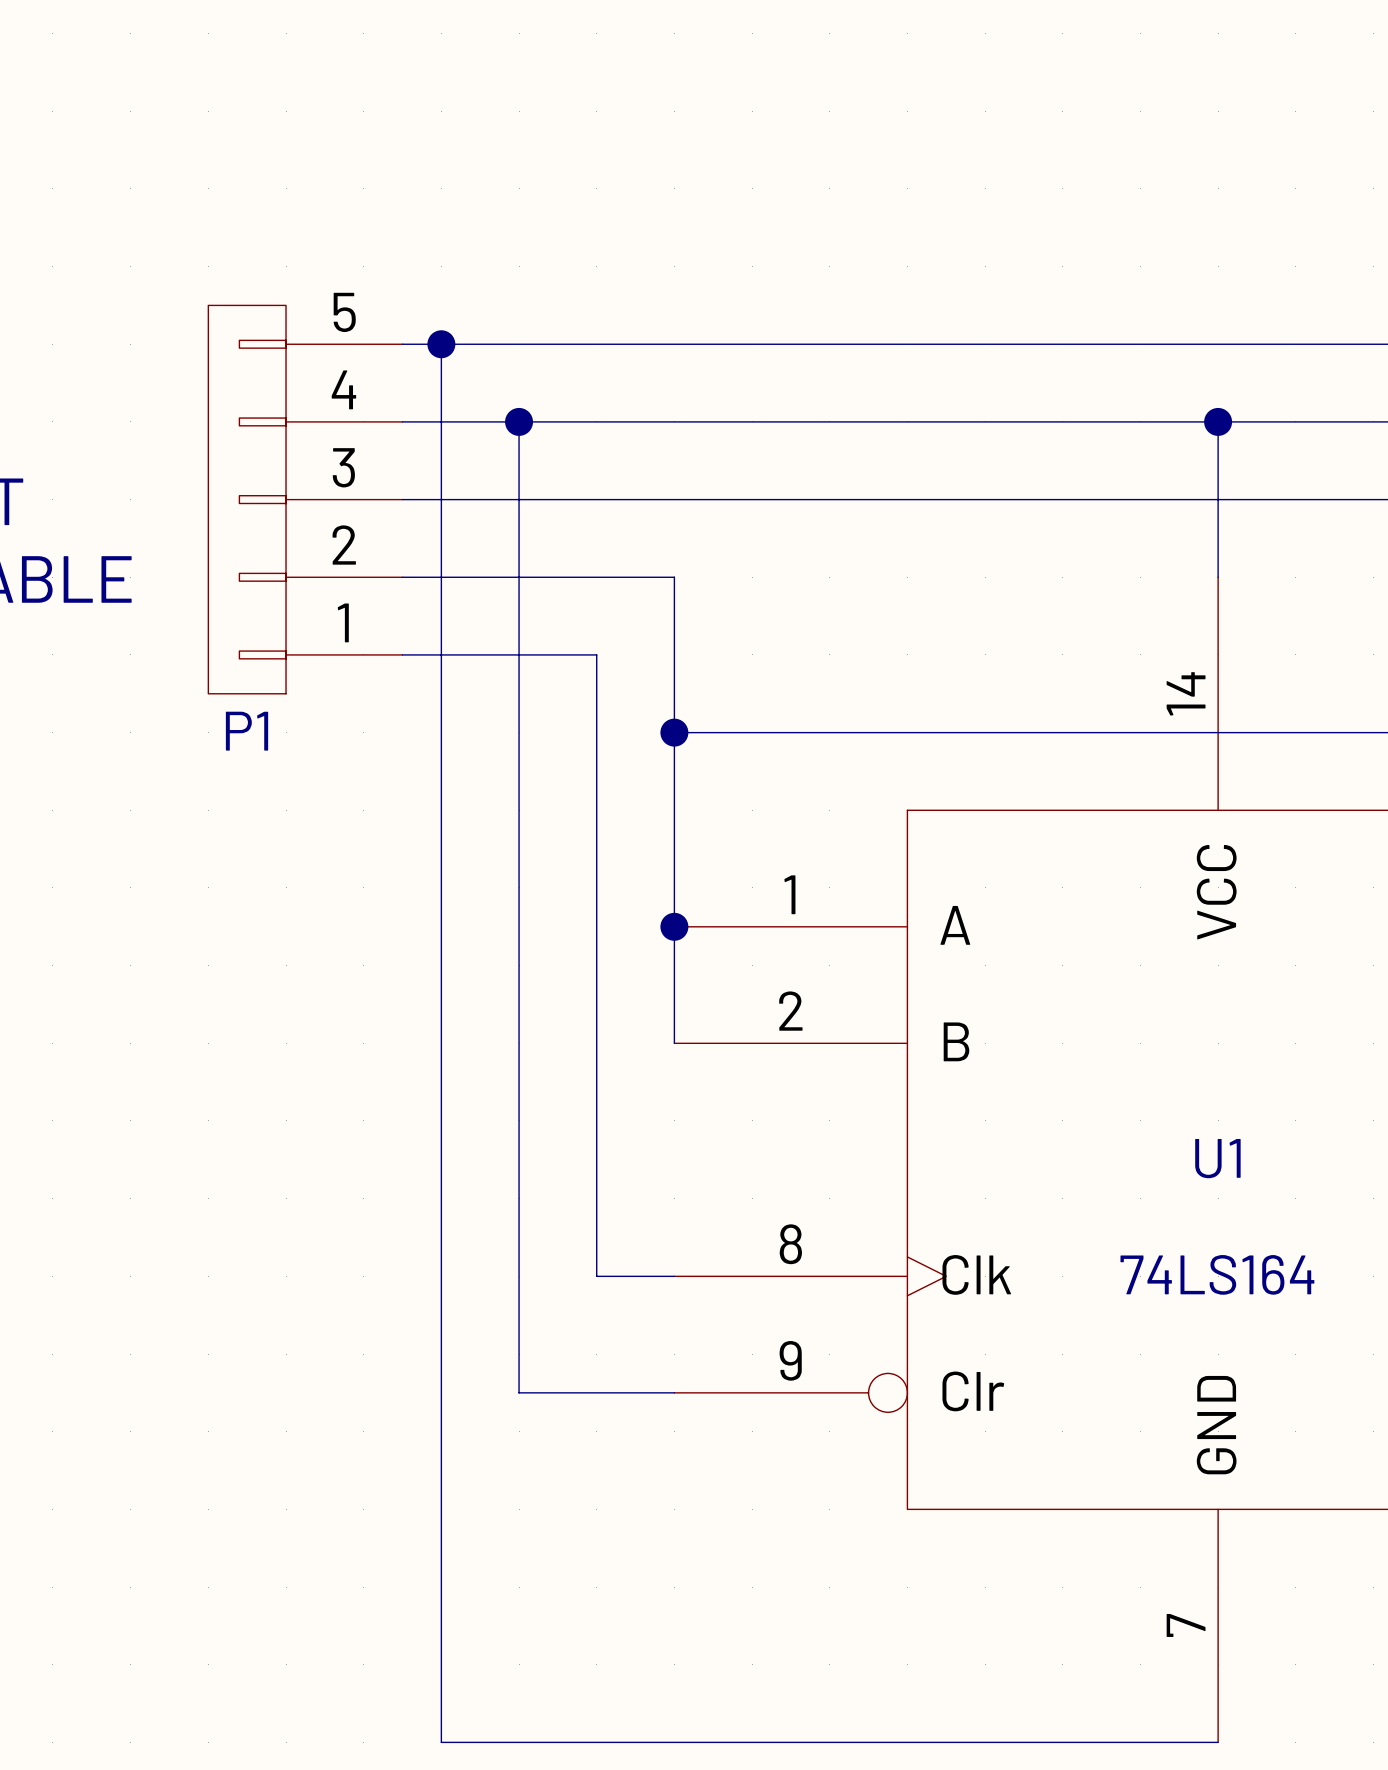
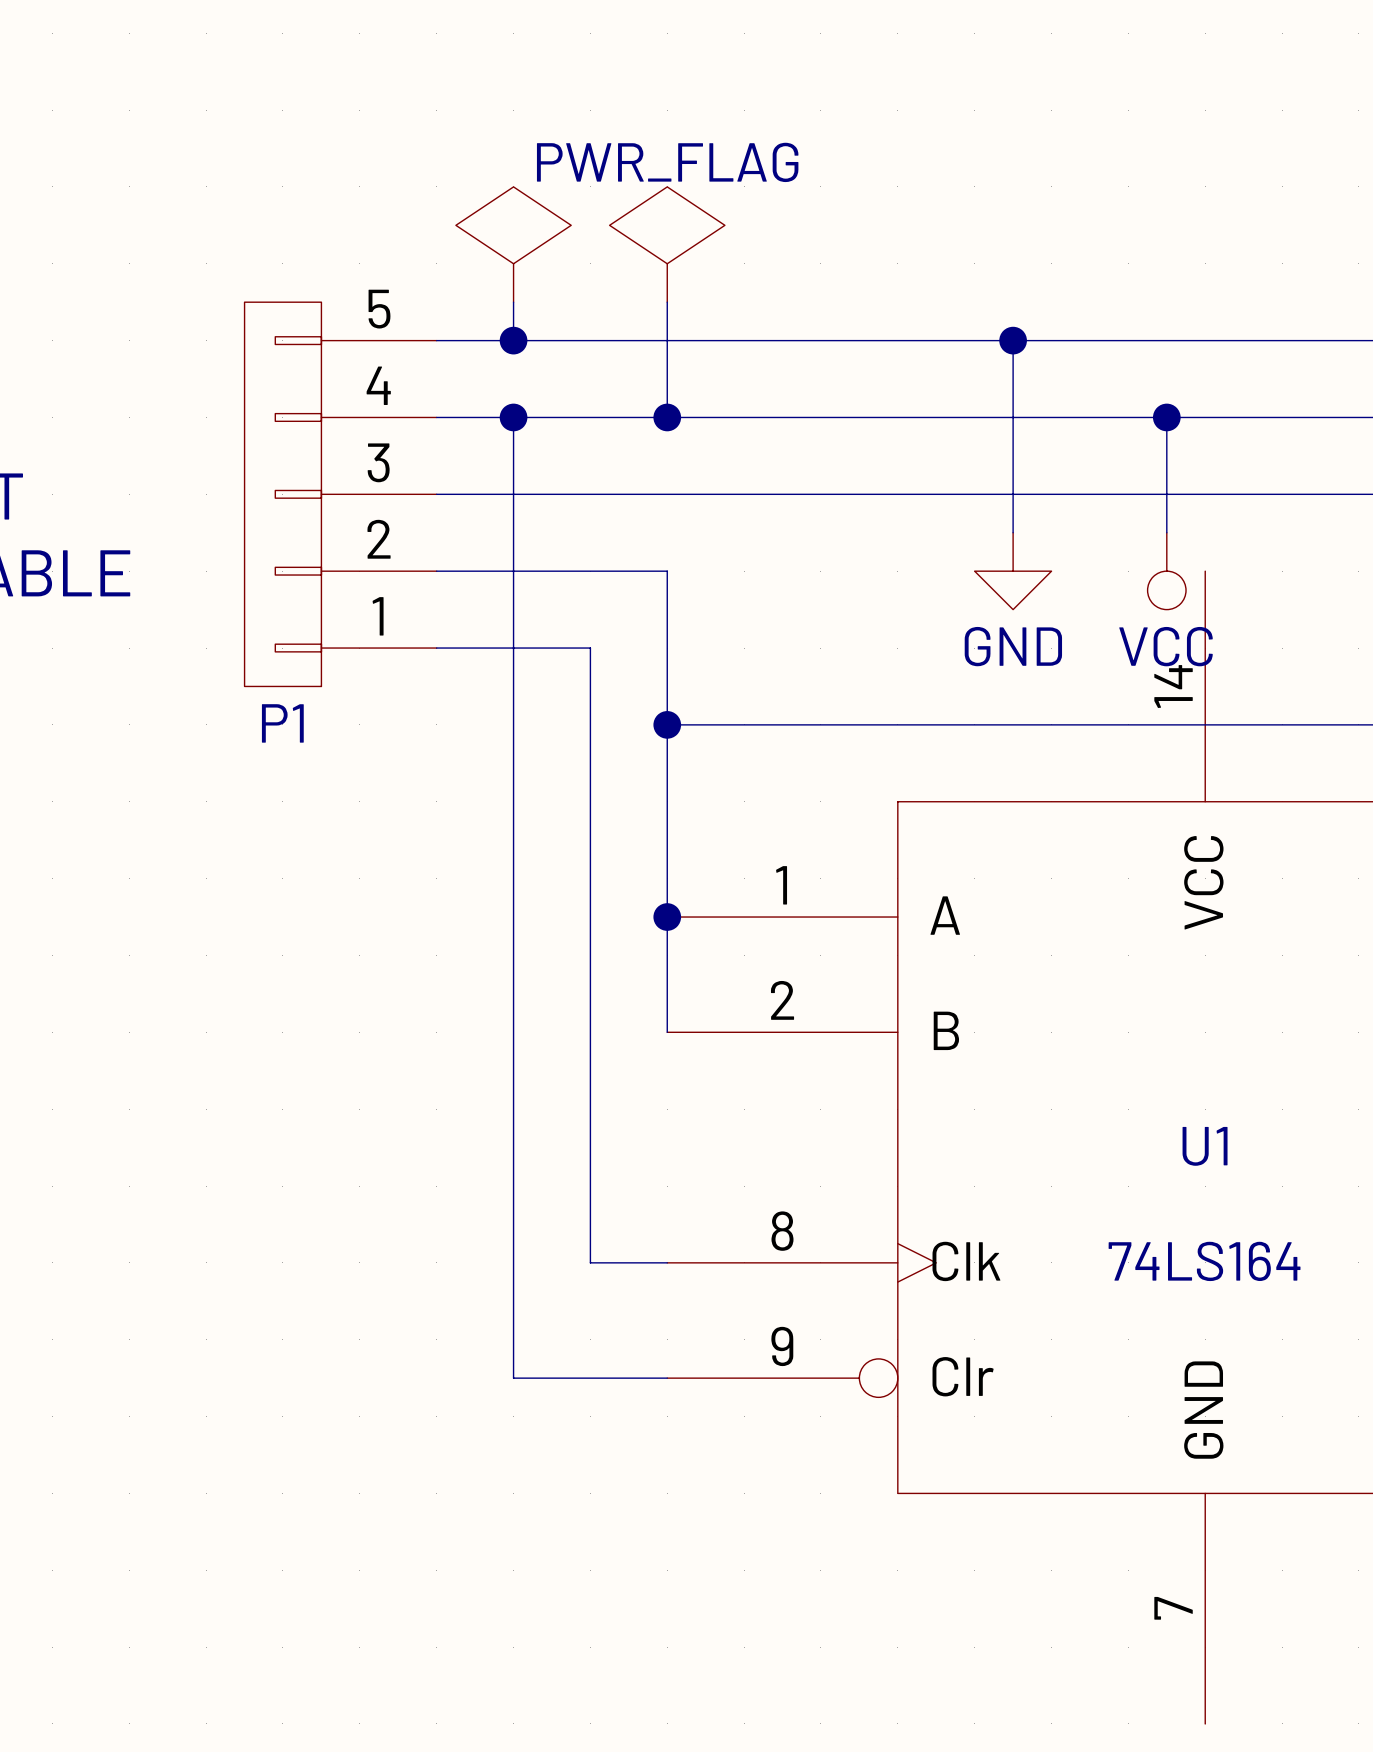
power symbol: none -> (513, 244)
power symbol: none -> PWR_FLAG (667, 244)
wire: none -> (513, 302) (513, 340)
wire: none -> (667, 302) (667, 417)
wire: (402, 344) (441, 344) (441, 1742) (1218, 1742) -> none
junction position: (441, 344) -> (513, 340)
wire: none -> (1013, 340) (1013, 532)
junction: none -> (1013, 340)
junction: none -> (667, 417)
wire: none -> (1166, 417) (1166, 532)
wire: (1218, 421) (1218, 577) -> none
junction position: (1218, 421) -> (1166, 417)
P1 position: (305, 499) -> (340, 494)
power symbol: none -> GND (1013, 571)
power symbol: none -> VCC (1166, 571)

